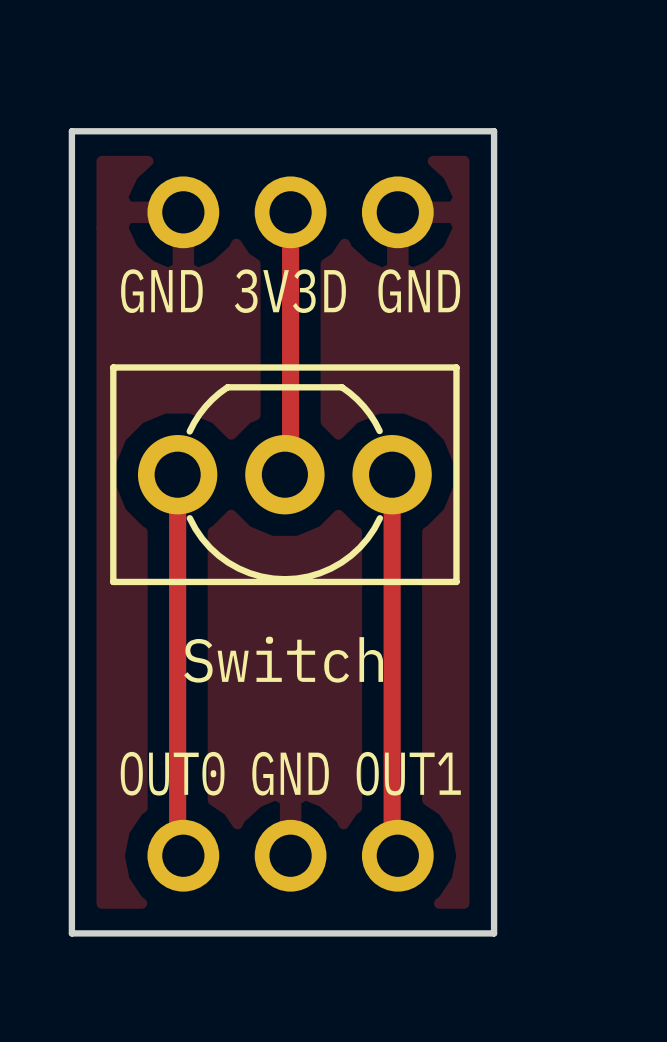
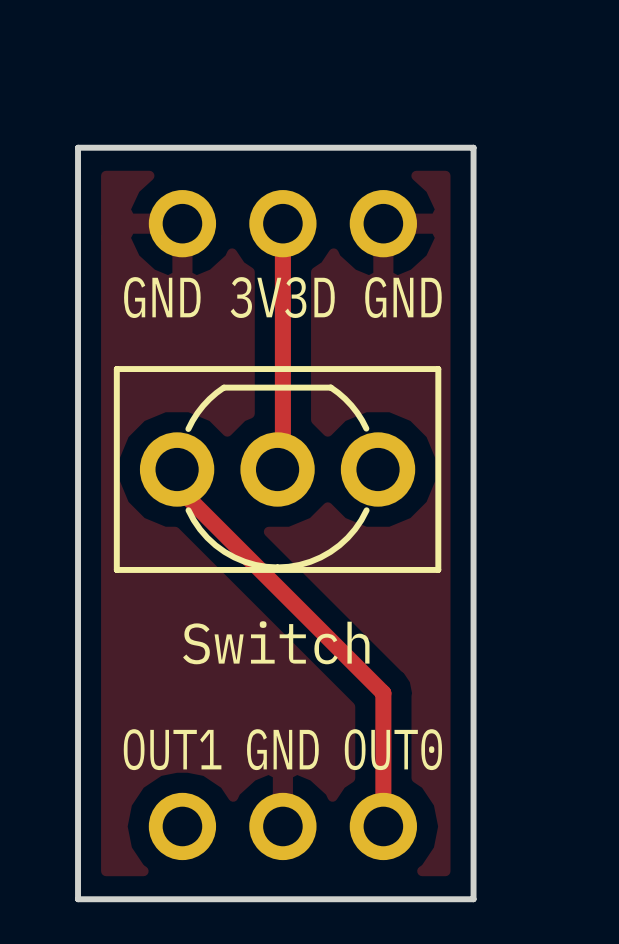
track: (392, 474) (392, 850) (397, 855) -> none
track: (177, 493) (177, 850) (183, 855) -> (177, 486) (383, 693) (383, 826)
text: OUT0 (172, 773) -> OUT1 (172, 749)
text: OUT1 (408, 773) -> OUT0 (393, 749)

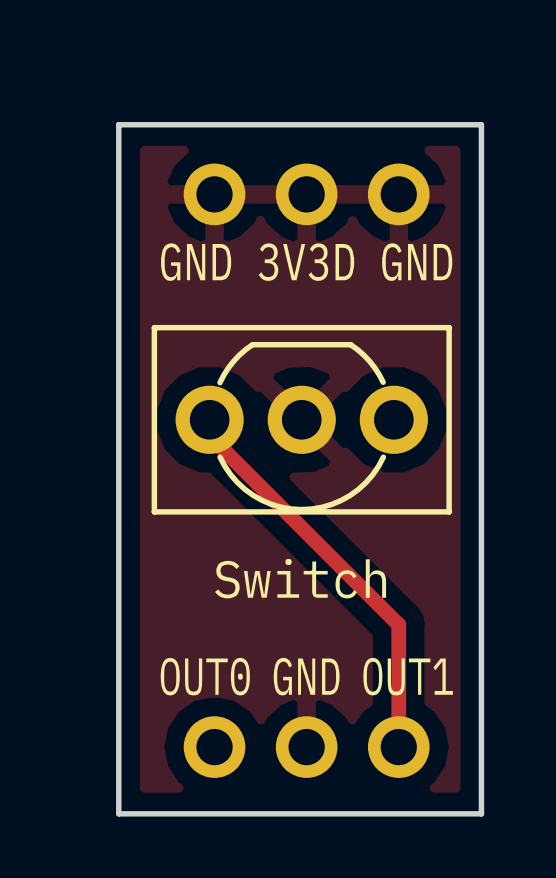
track: (282, 223) (282, 464) (277, 469) -> none
text: OUT1 (172, 749) -> OUT0 (205, 676)
text: OUT0 (393, 749) -> OUT1 (408, 676)

